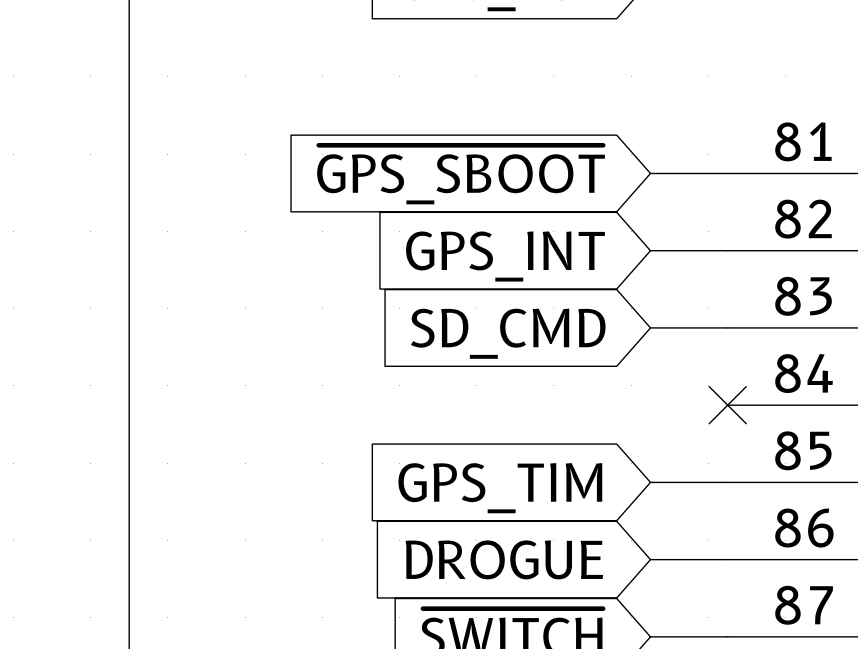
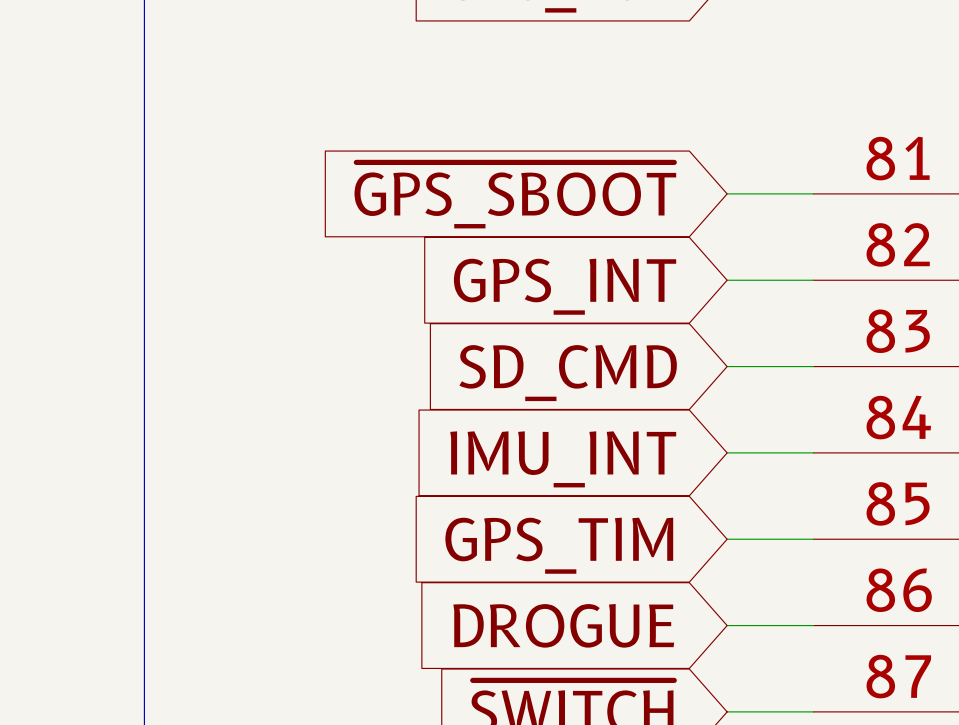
wire: none -> (727, 452) (813, 452)
no-connect mark: (727, 405) -> none
global label: none -> IMU_INT (563, 459)

